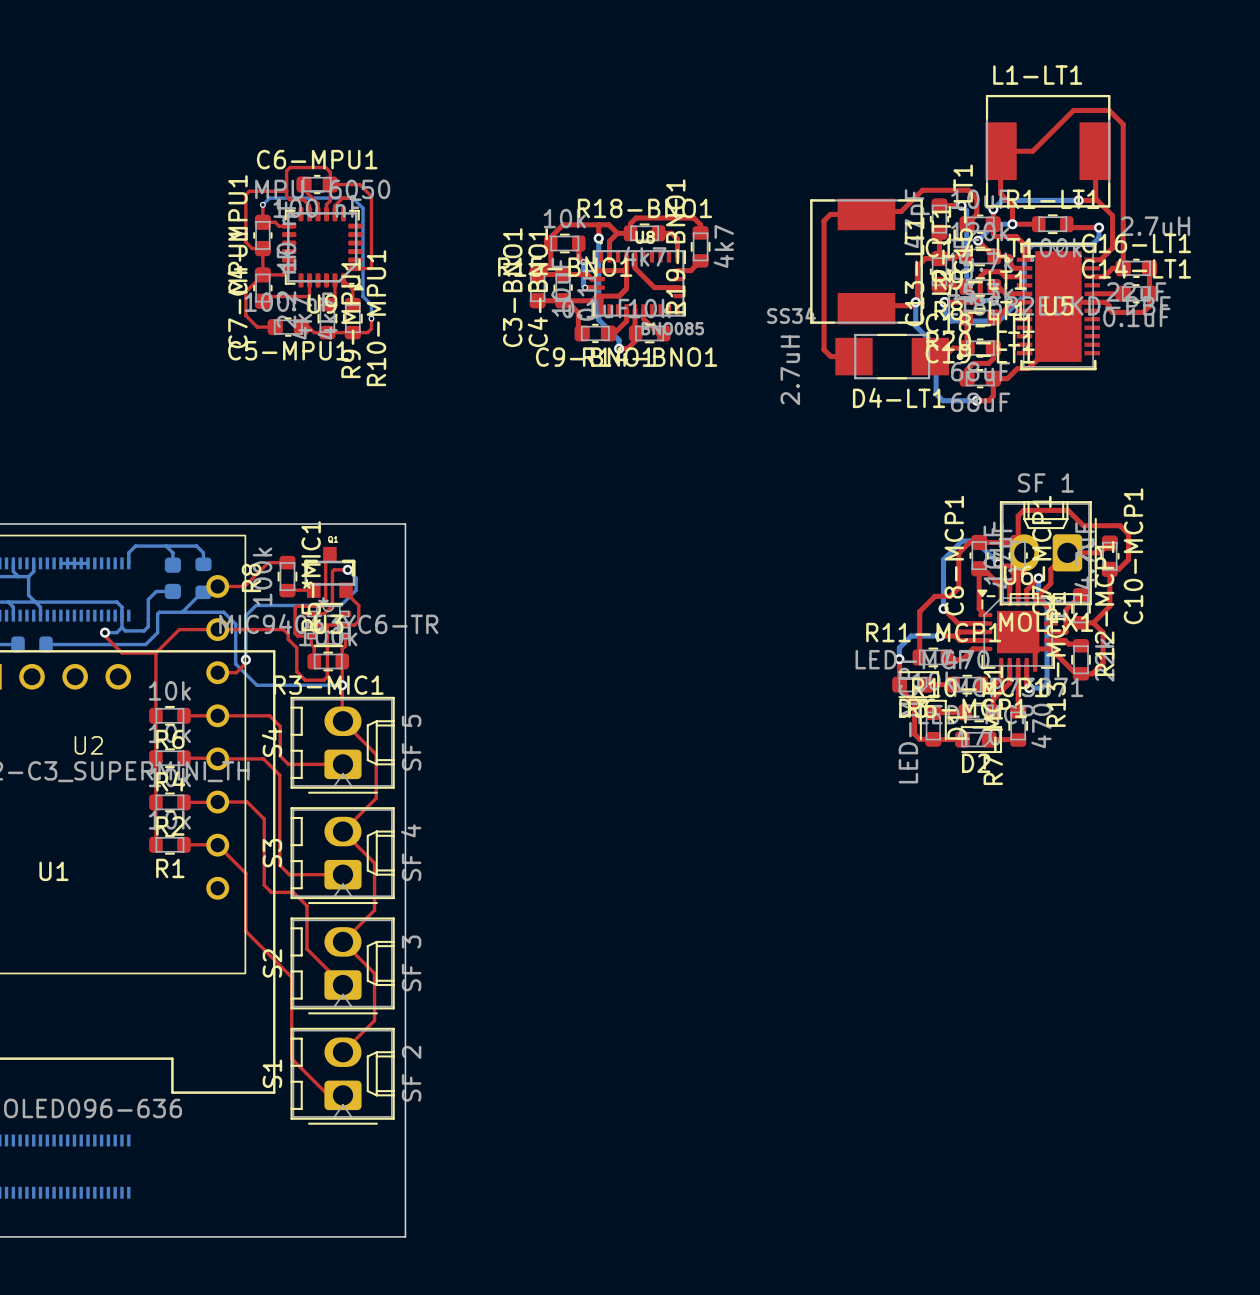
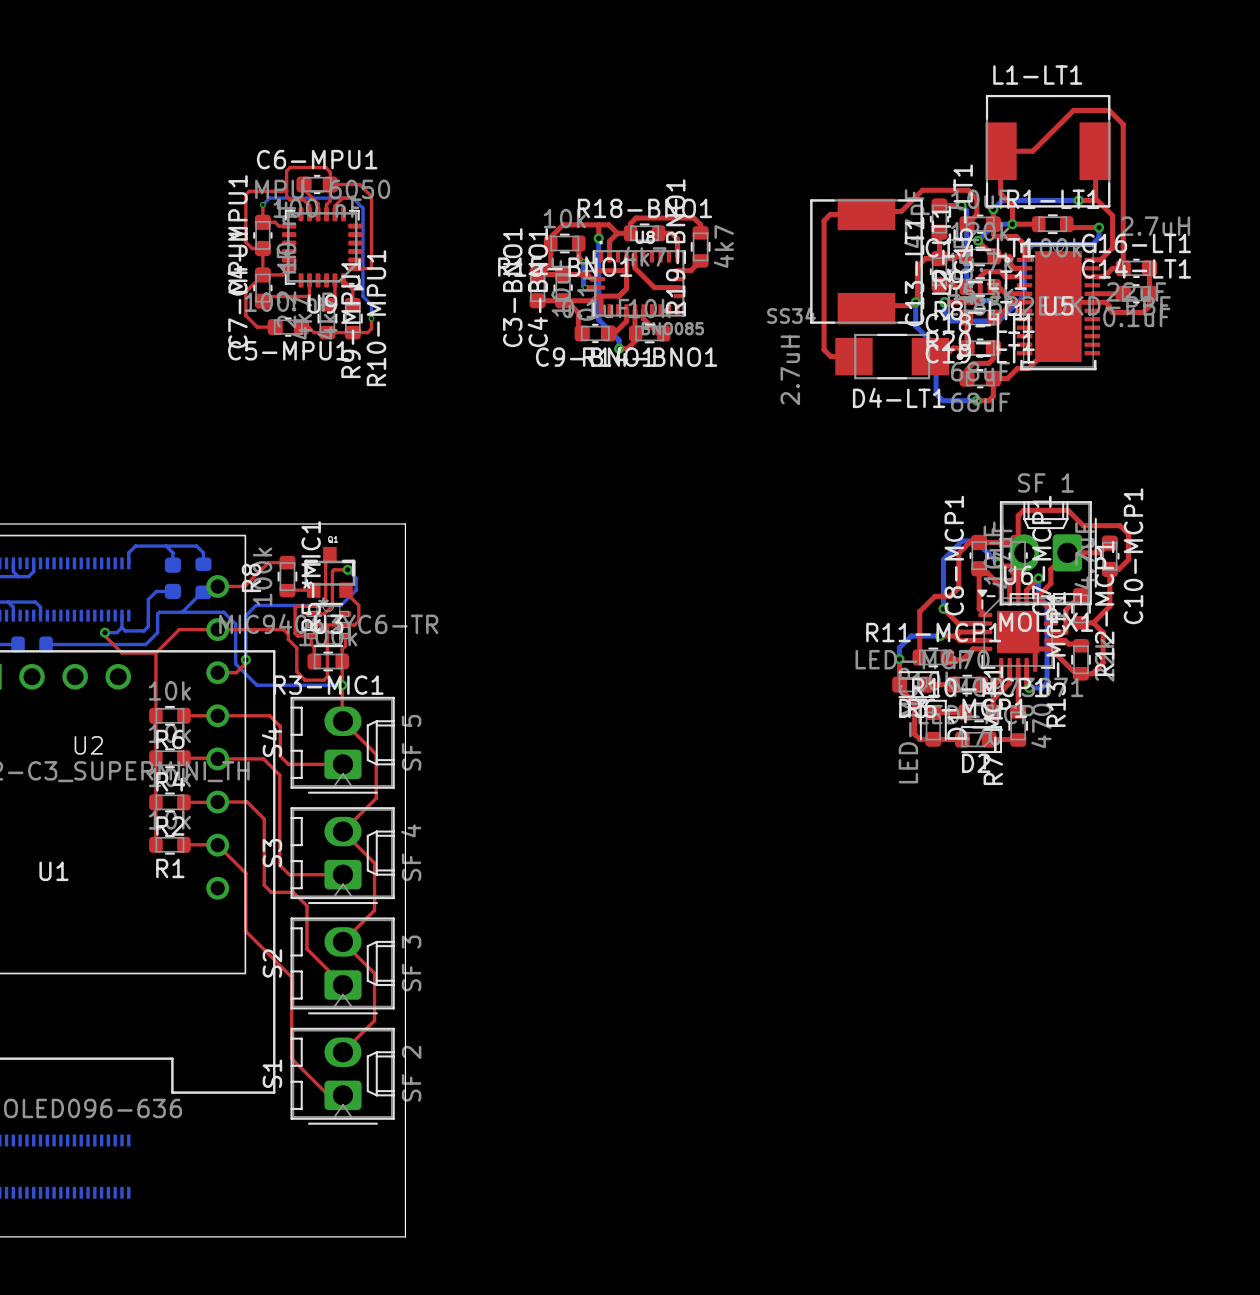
bottom track: (60, 563) (88, 563) -> none
bottom track: (28, 576) (28, 595) (35, 602) (116, 602) (121, 607) (121, 615) -> none

